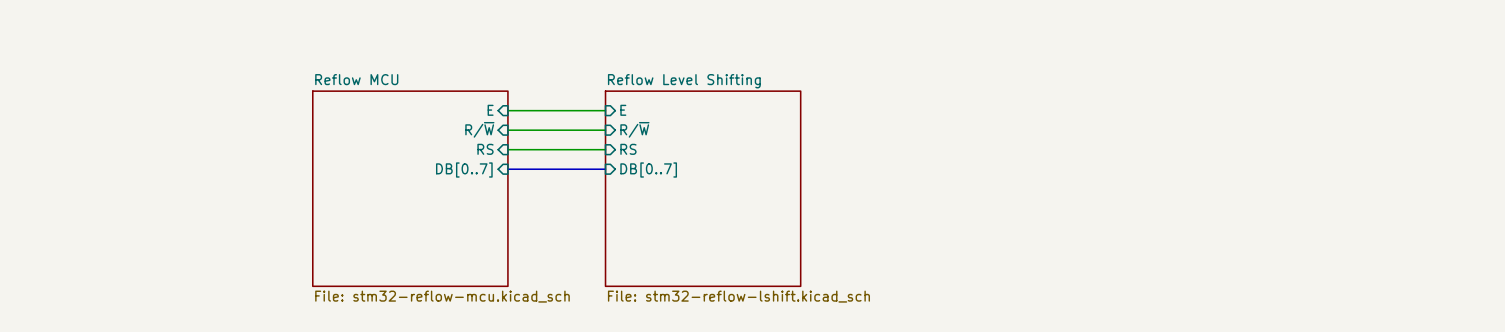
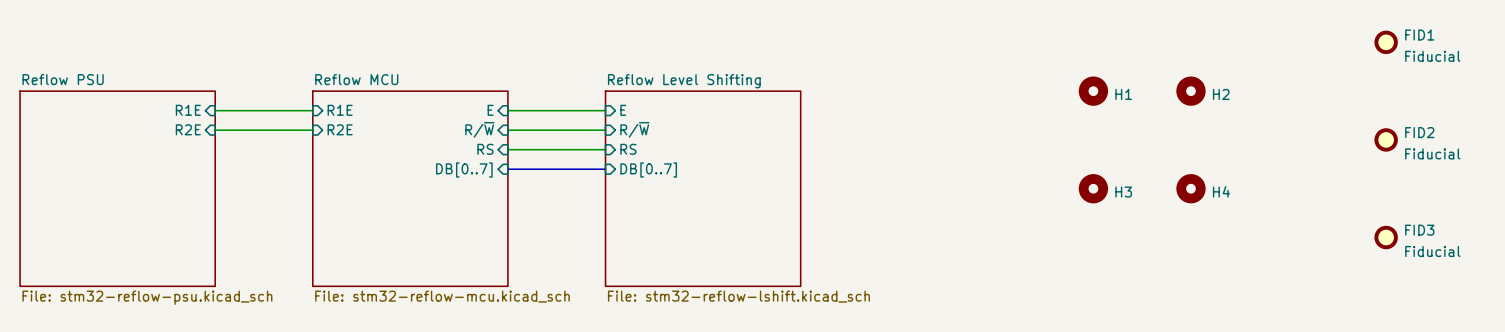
FID1: none -> Fiducial (1386, 42)
H1: none -> (1093, 91)
H2: none -> (1190, 91)
sheet pin: none -> R1E (188, 110)
wire: none -> (215, 110) (312, 110)
sheet pin: none -> R1E (340, 110)
sheet pin: none -> R2E (188, 129)
sheet pin: none -> R2E (340, 129)
wire: none -> (215, 130) (312, 130)
FID2: none -> Fiducial (1386, 139)
sheet Reflow PSU: none -> File: stm32-reflow-psu.kicad_sch (117, 188)
H3: none -> (1093, 188)
H4: none -> (1190, 188)
FID3: none -> Fiducial (1386, 237)

